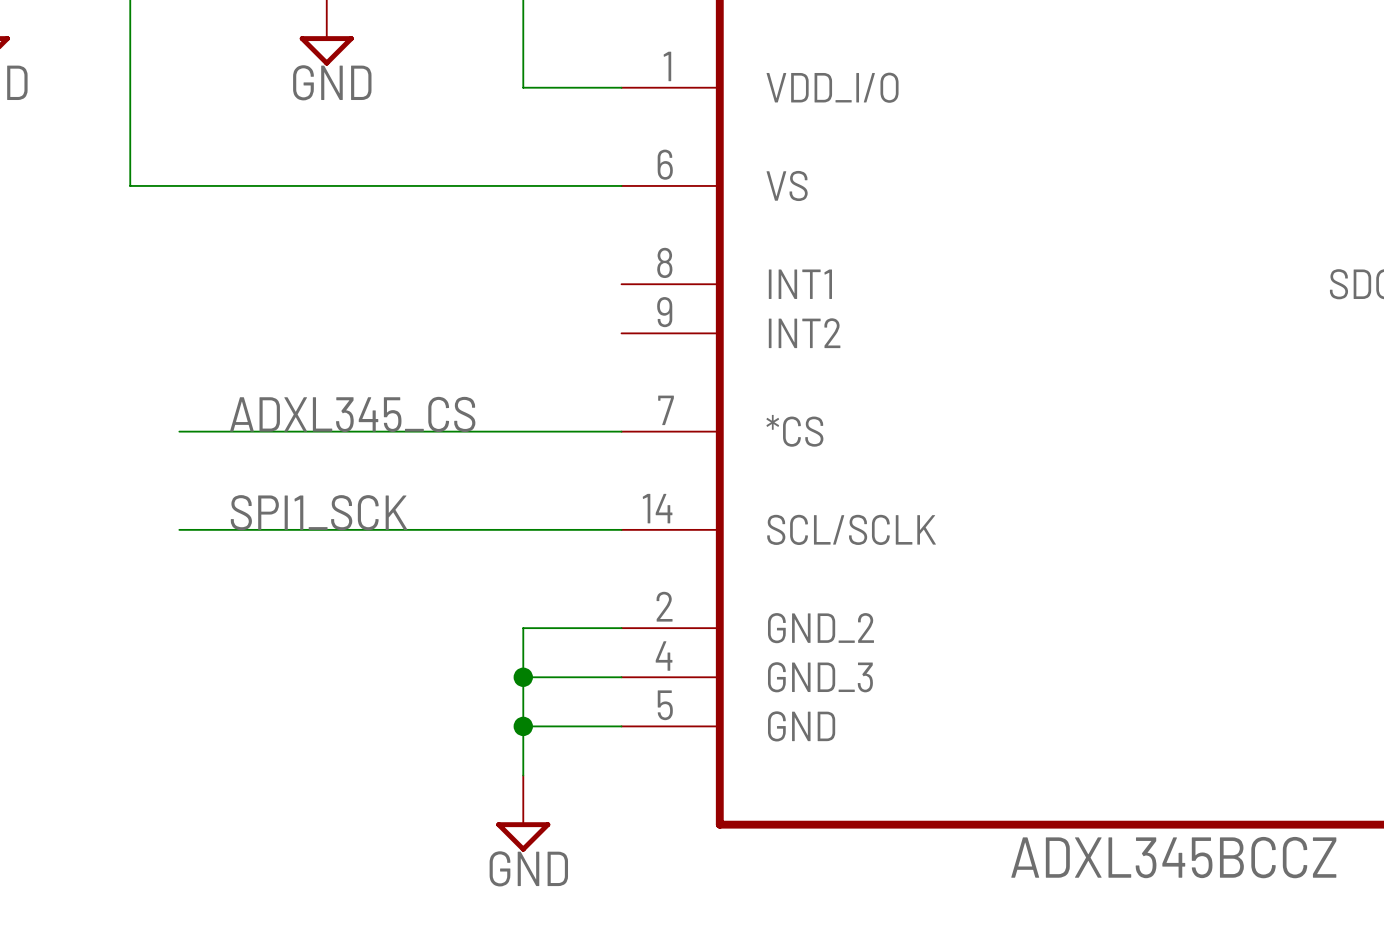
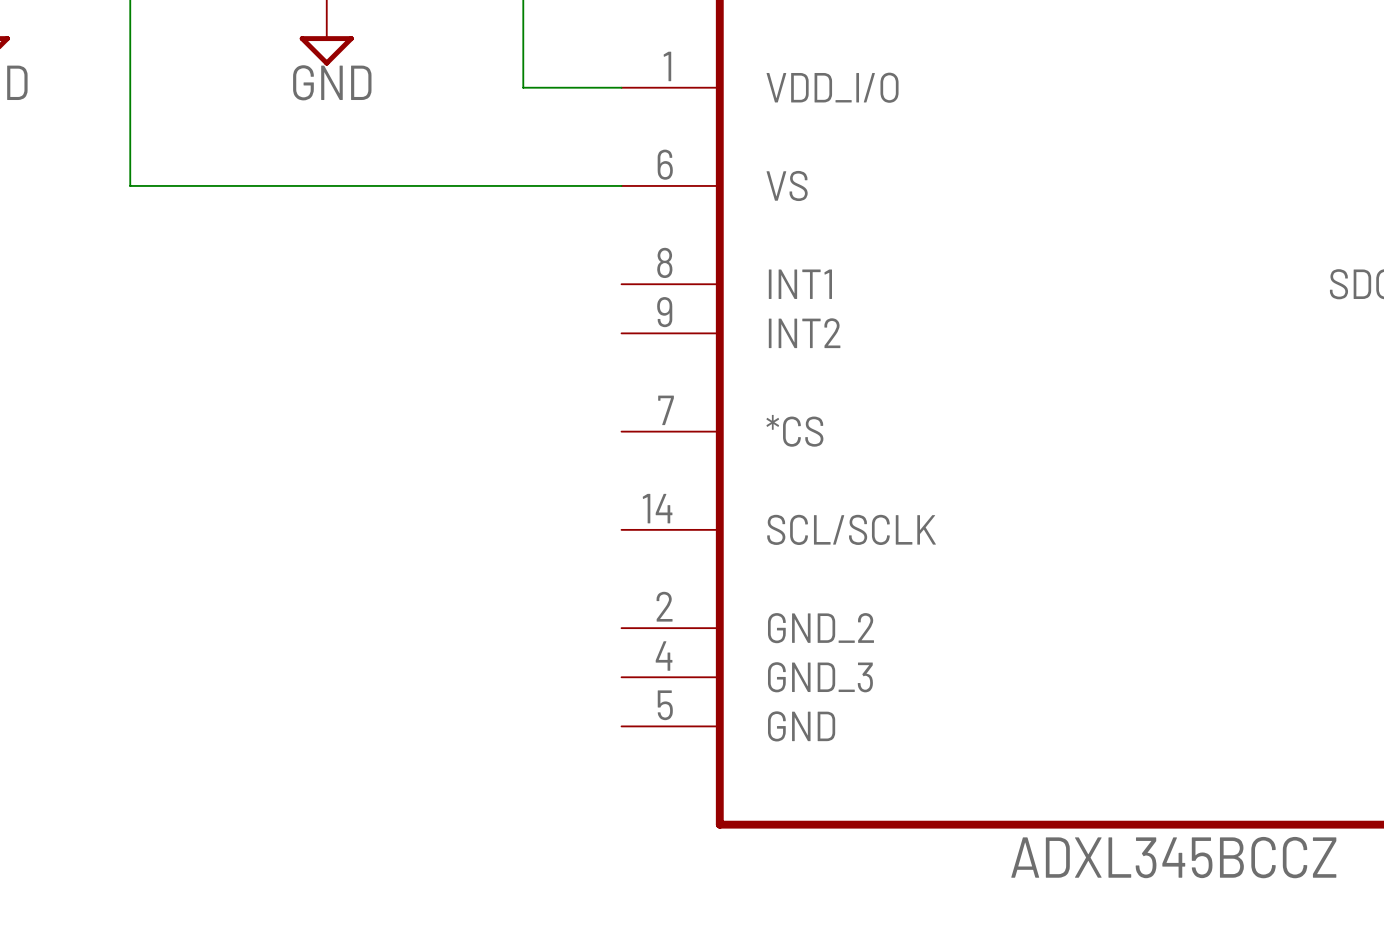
label: ADXL345_CS (352, 414) -> none
wire: (179, 431) (621, 431) -> none
label: SPI1_SCK (319, 512) -> none
wire: (179, 529) (621, 529) -> none
wire: (621, 628) (523, 628) (523, 775) -> none
wire: (523, 677) (621, 677) -> none
junction: (523, 677) -> none
wire: (523, 726) (621, 726) -> none
junction: (523, 726) -> none
power symbol: GND (523, 813) -> none

